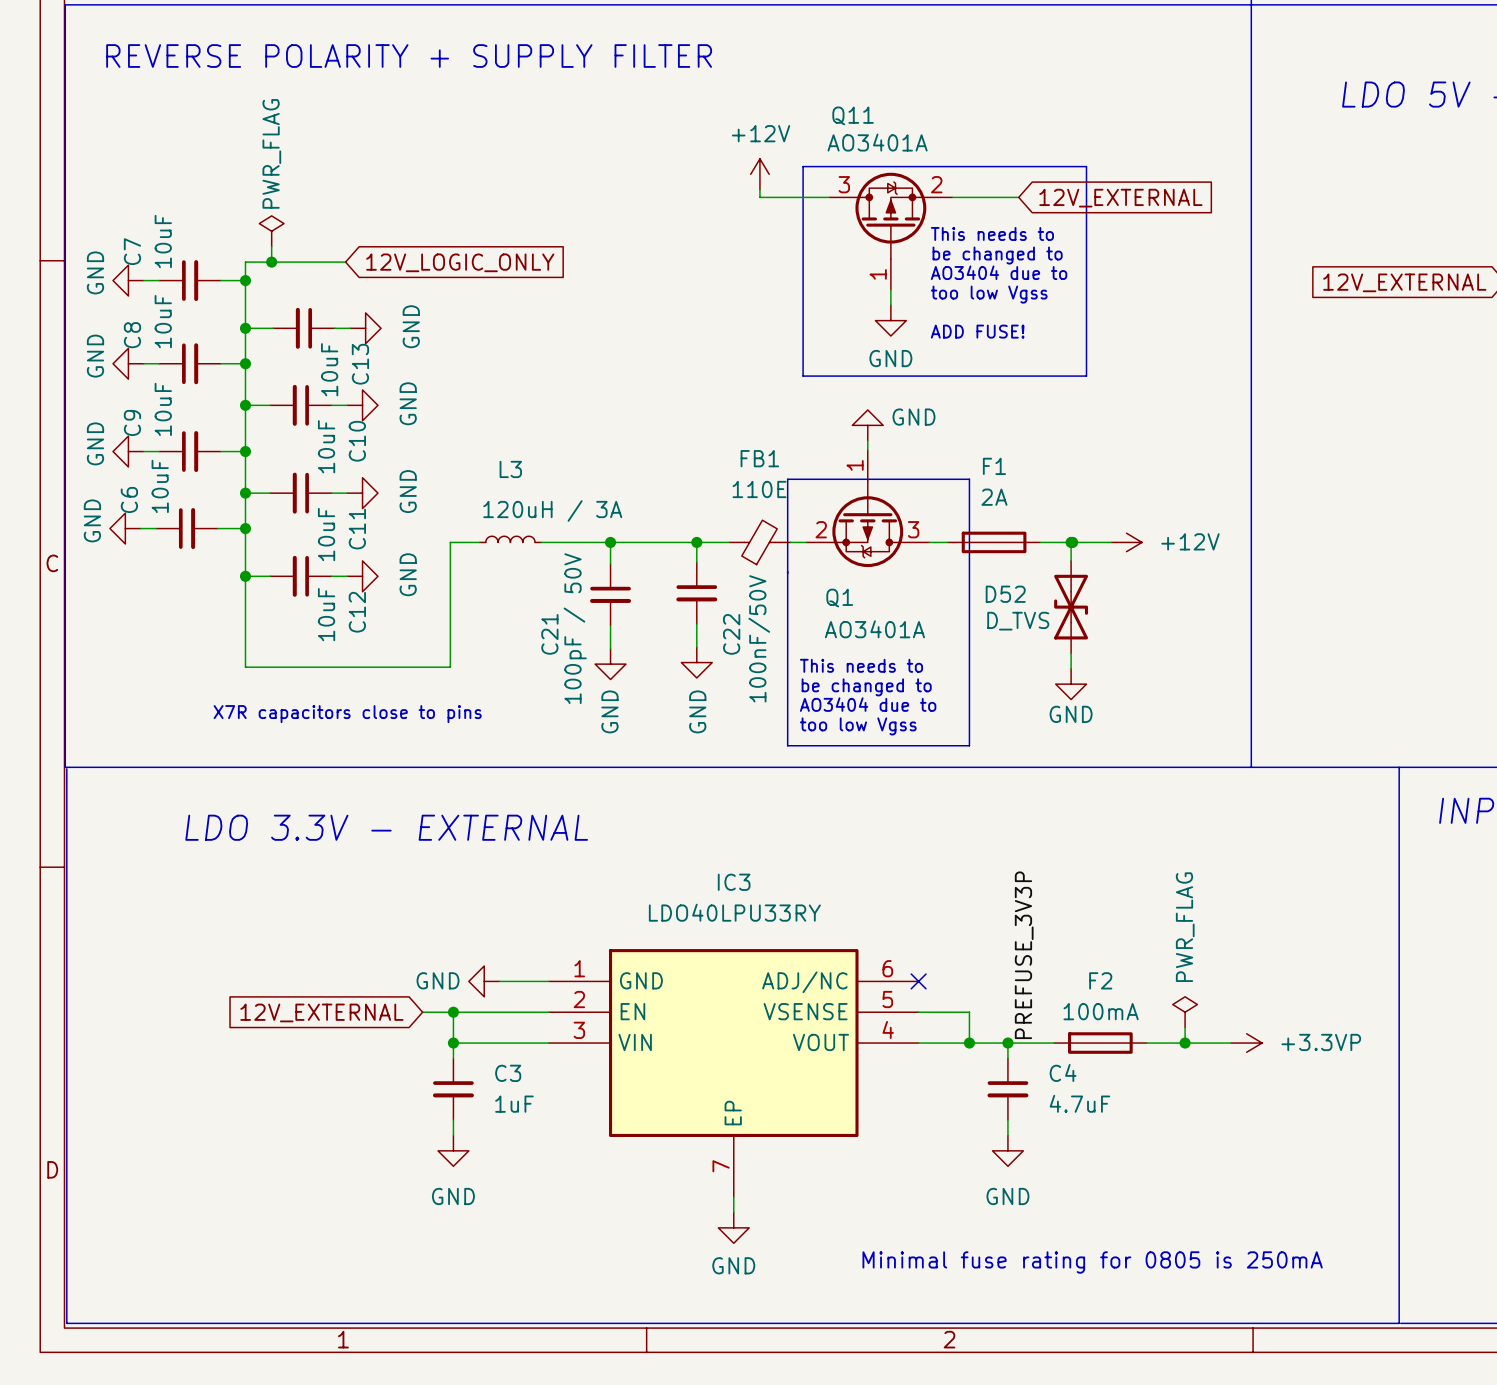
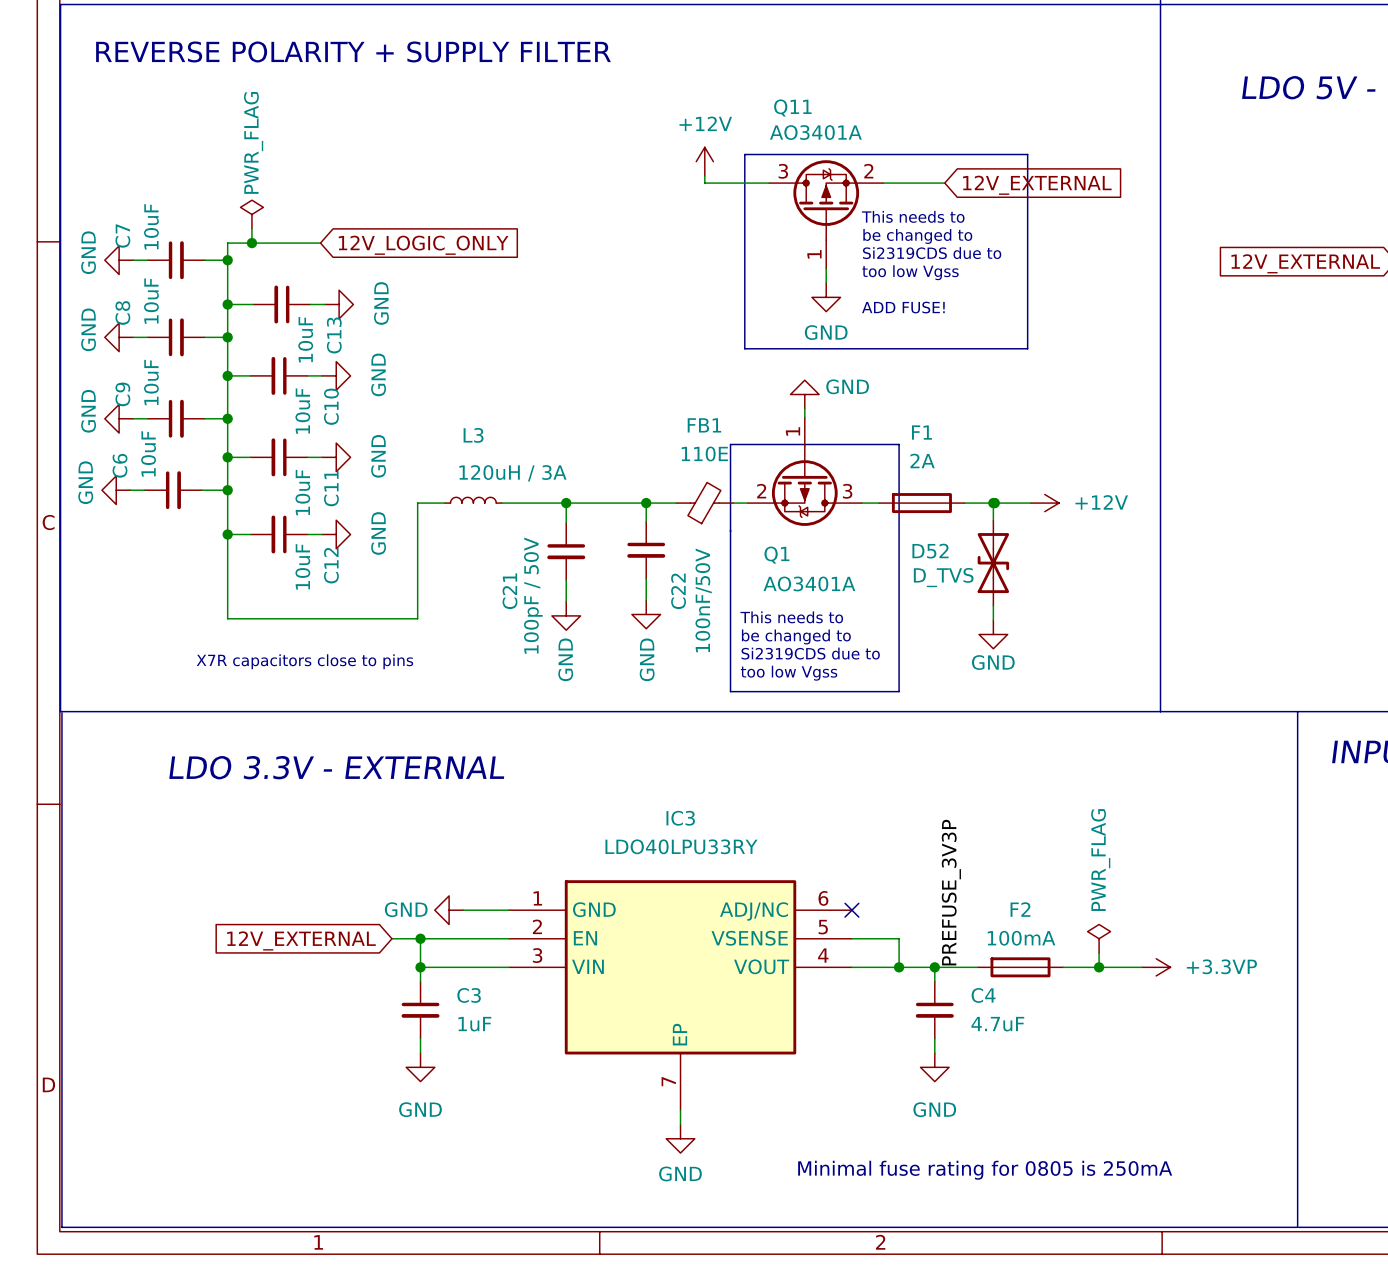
line: (1086, 166) (1086, 376) -> (1007, 154) (1027, 154) (1027, 348) (1007, 348)
text: AO3404 due to (999, 272) -> Si2319CDS due to (932, 253)
text: AO3404 due to (868, 704) -> Si2319CDS due to (810, 653)

